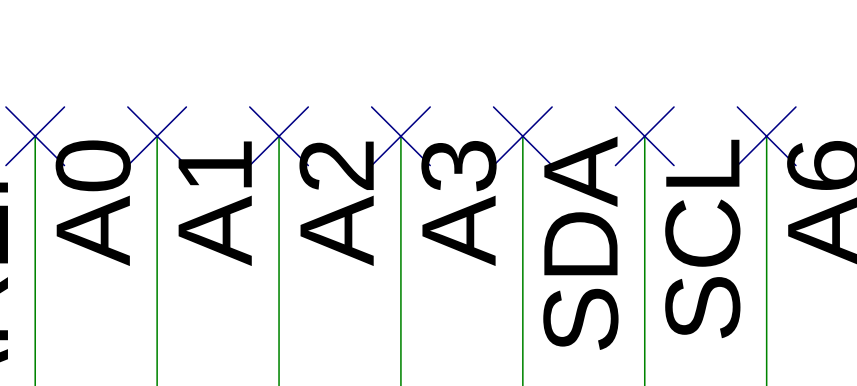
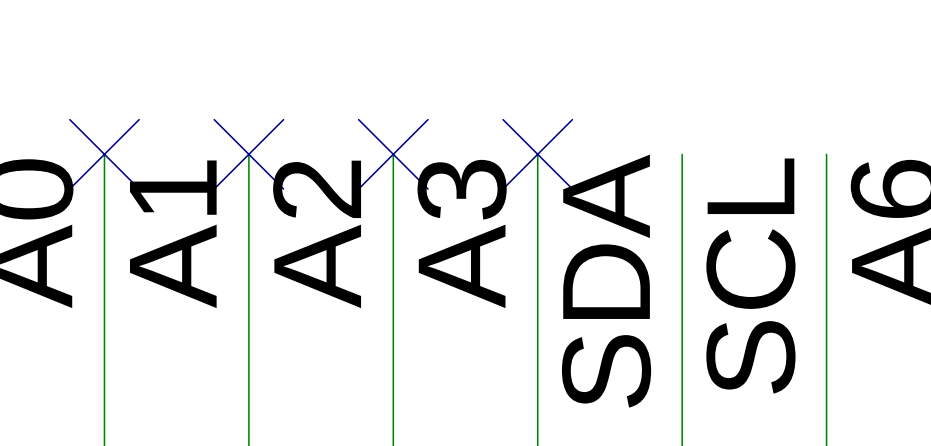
no-connect mark: (644, 136) -> none
no-connect mark: (766, 136) -> none

